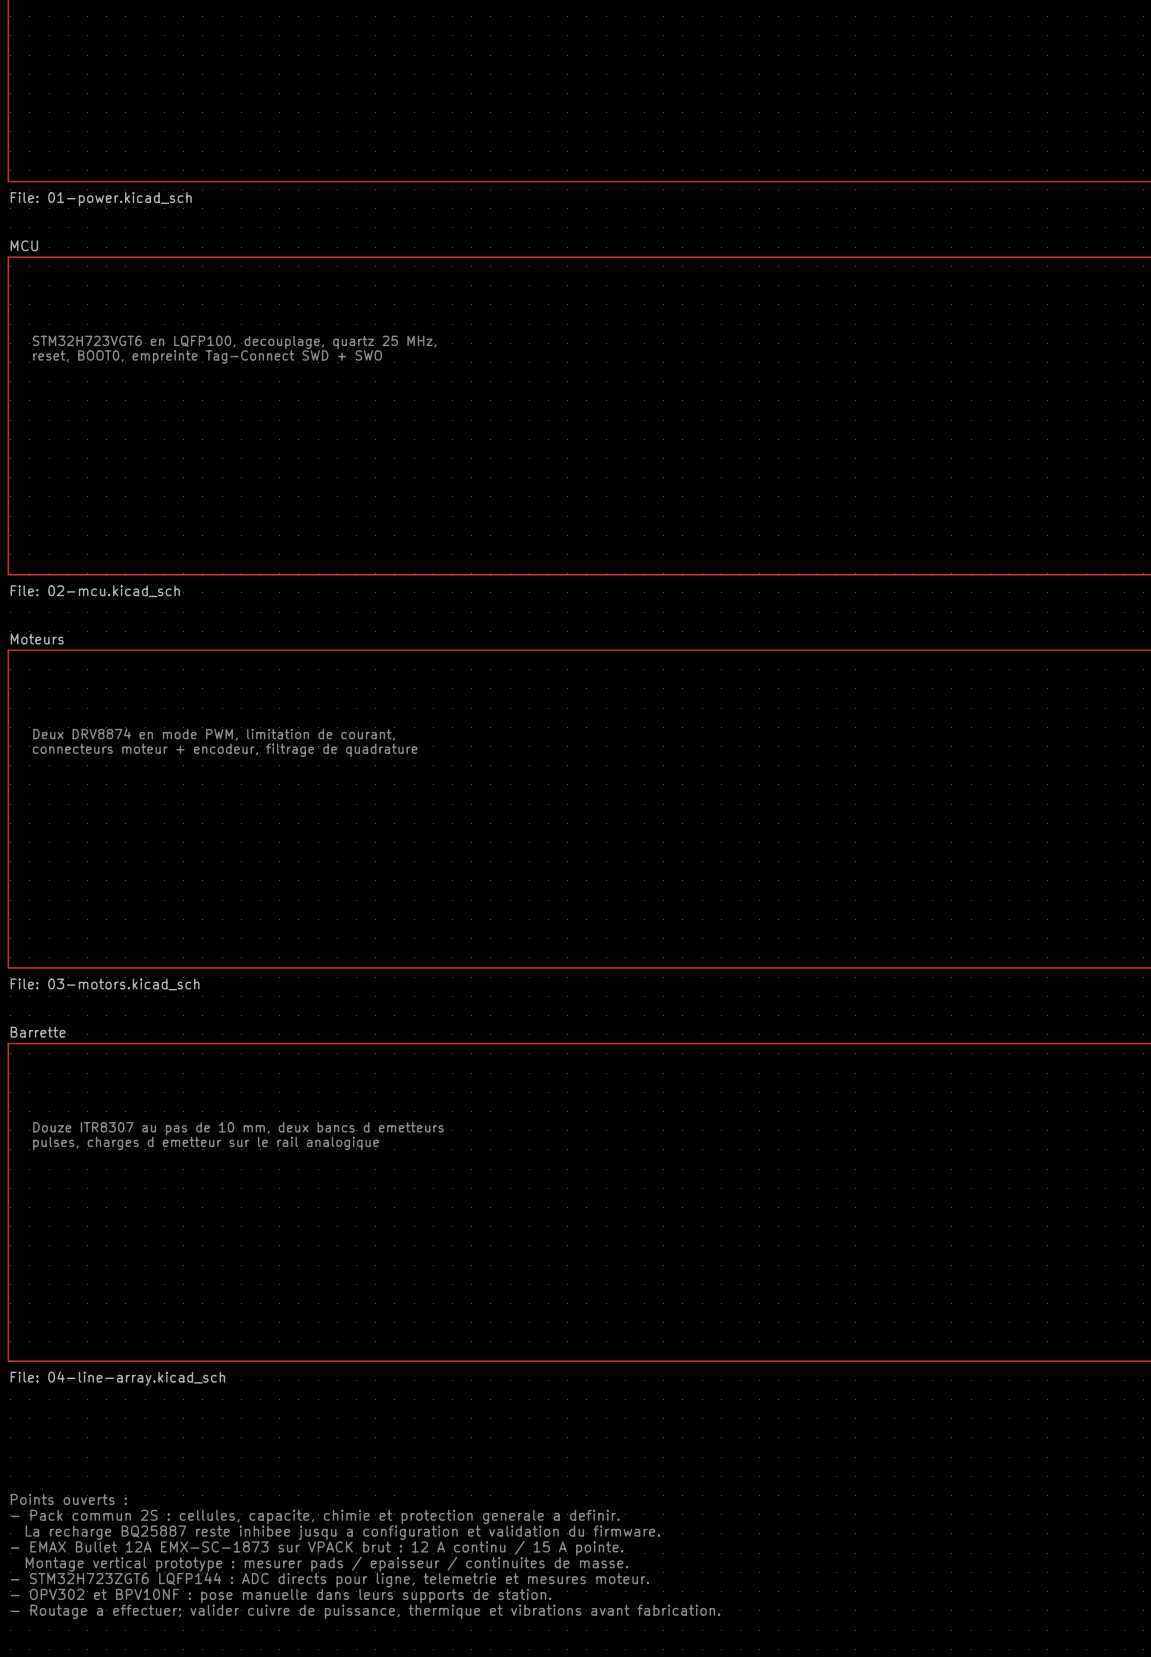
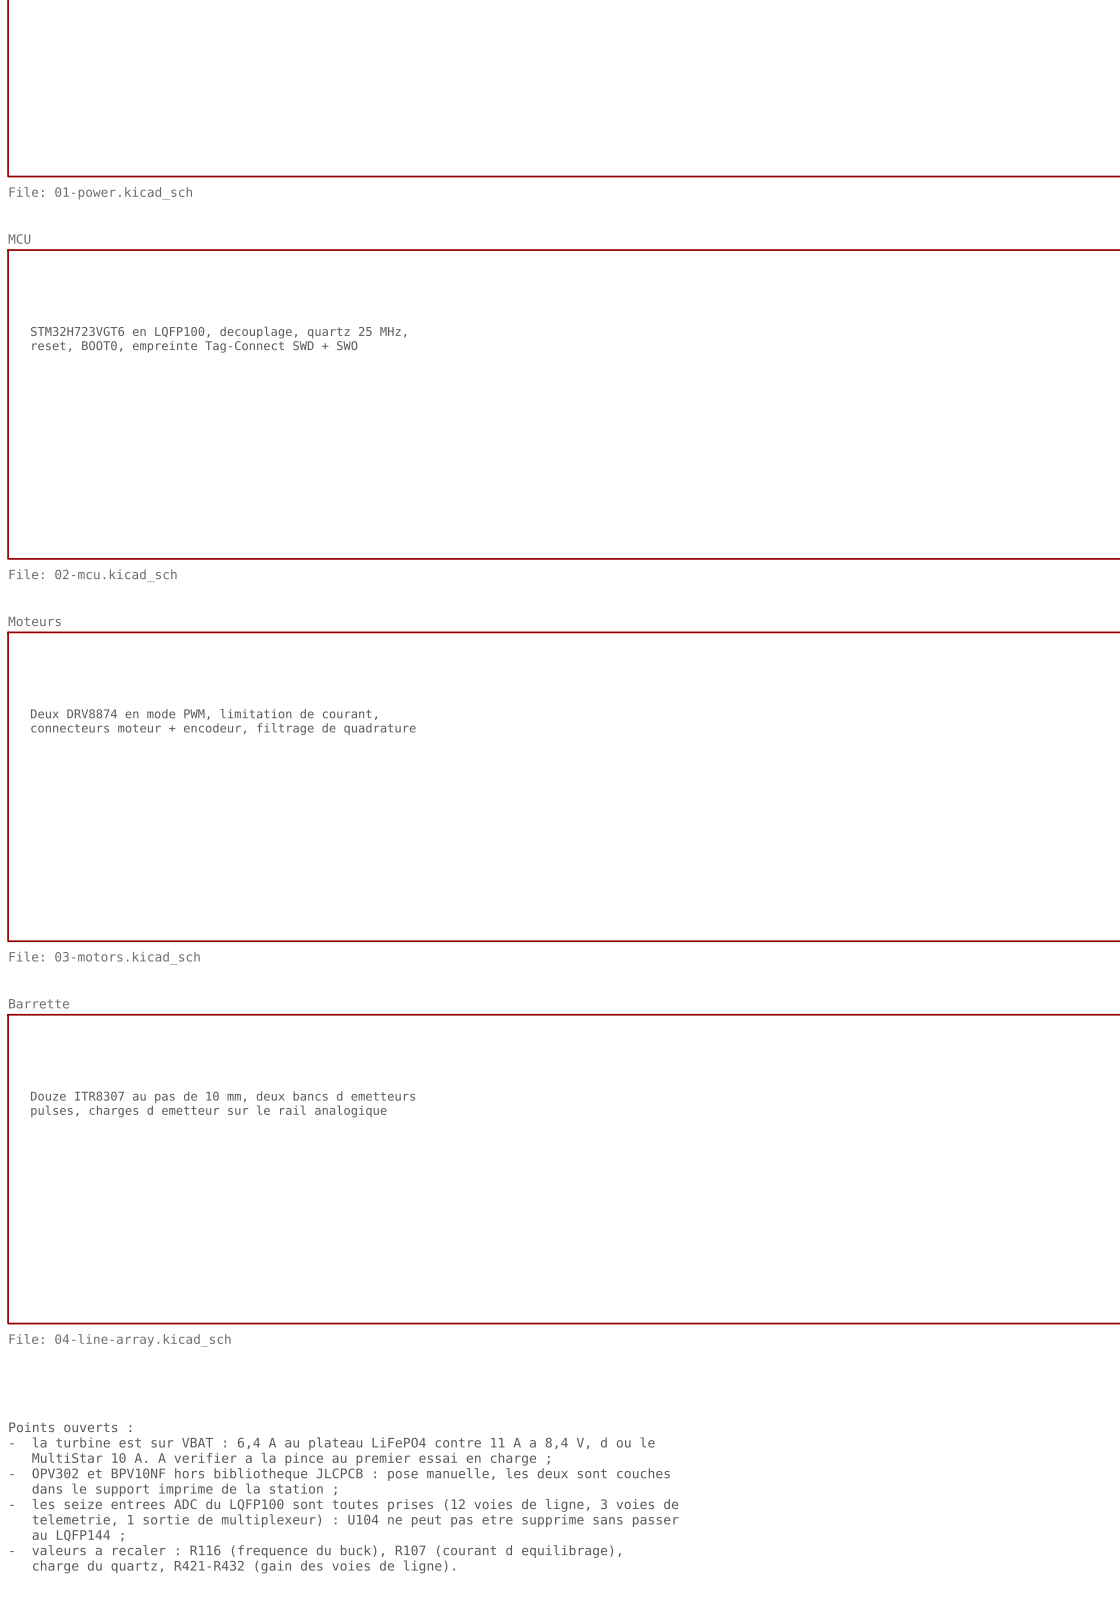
text: none -> Points ouverts : (70, 1427)
text: none -> - la turbine est sur VBAT : 6,4 A au plateau LiFePO4 contre 11 A a 8,4 V, d ou le (332, 1443)
text: Points ouverts : (68, 1499) -> MultiStar 10 A. A verifier a la pince au premier essai en charge ; (290, 1459)
text: - Pack commun 2S : cellules, capacite, chimie et protection generale a definir. (315, 1516) -> - OPV302 et BPV10NF hors bibliotheque JLCPCB : pose manuelle, les deux sont couches (340, 1474)
text: La recharge BQ25887 reste inhibee jusqu a configuration et validation du firmware. (342, 1532) -> dans le support imprime de la station ; (184, 1489)
text: - EMAX Bullet 12A EMX-SC-1873 sur VPACK brut : 12 A continu / 15 A pointe. (317, 1548) -> - les seize entrees ADC du LQFP100 sont toutes prises (12 voies de ligne, 3 voies de (344, 1505)
text: Montage vertical prototype : mesurer pads / epaisseur / continuites de masse. (326, 1564) -> telemetrie, 1 sortie de multiplexeur) : U104 ne peut pas etre supprime sans passer (355, 1520)
text: - STM32H723ZGT6 LQFP144 : ADC directs pour ligne, telemetrie et mesures moteur. (329, 1579) -> au LQFP144 ; (78, 1535)
text: - OPV302 et BPV10NF : pose manuelle dans leurs supports de station. (281, 1596) -> - valeurs a recaler : R116 (frequence du buck), R107 (courant d equilibrage), (315, 1551)
text: - Routage a effectuer; valider cuivre de puissance, thermique et vibrations avant fabrication. (365, 1611) -> charge du quartz, R421-R432 (gain des voies de ligne). (243, 1566)

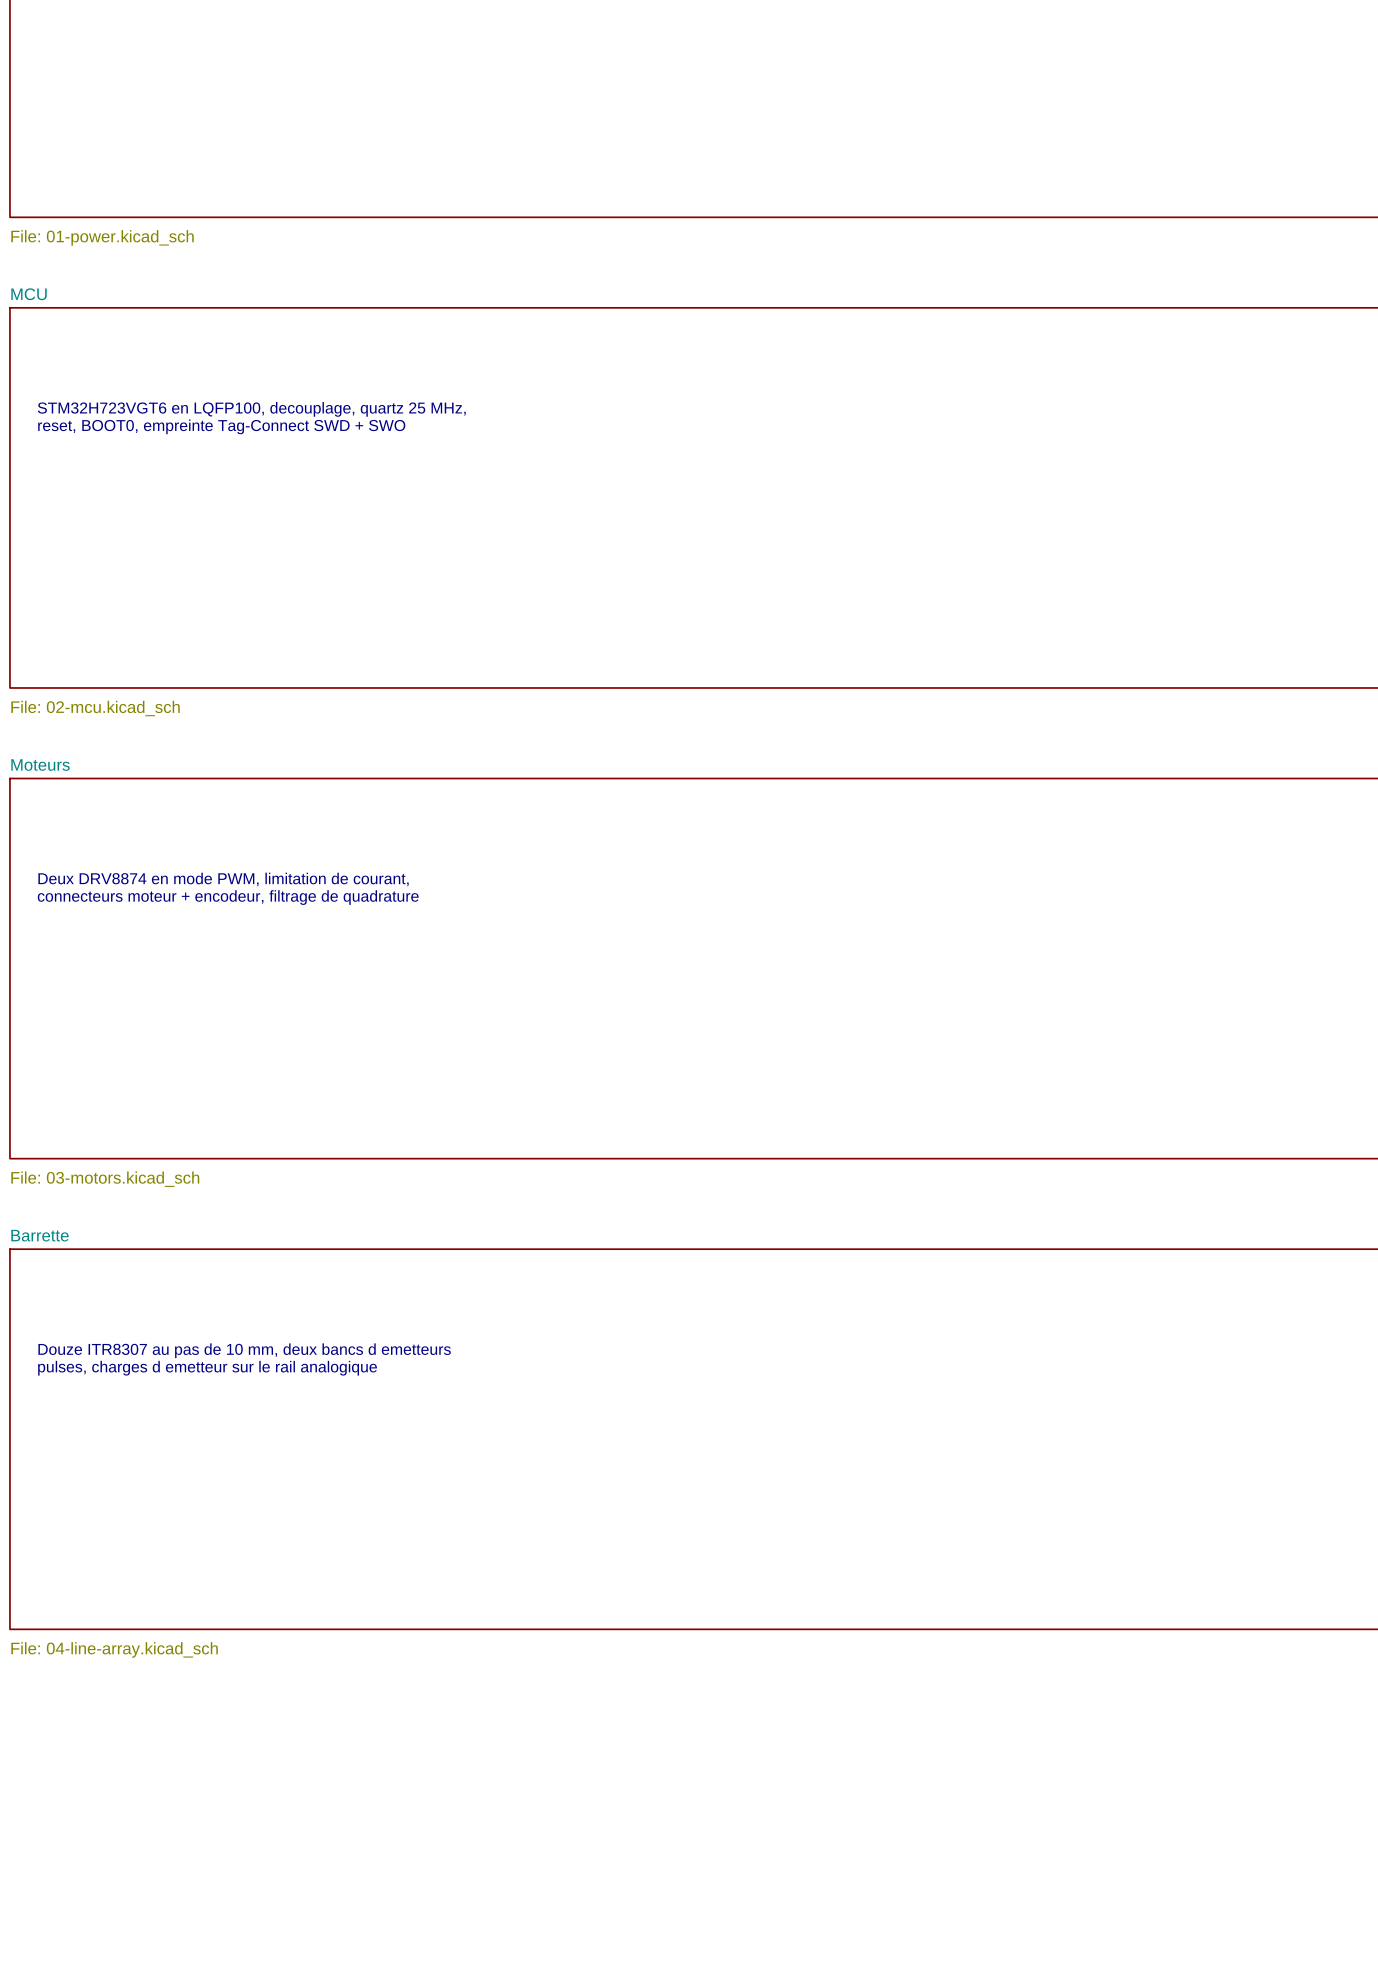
text: Points ouverts : (70, 1427) -> none
text: - la turbine est sur VBAT : 6,4 A au plateau LiFePO4 contre 11 A a 8,4 V, d ou le (332, 1443) -> none
text: MultiStar 10 A. A verifier a la pince au premier essai en charge ; (290, 1459) -> none
text: - OPV302 et BPV10NF hors bibliotheque JLCPCB : pose manuelle, les deux sont couches (340, 1474) -> none
text: dans le support imprime de la station ; (184, 1489) -> none
text: - les seize entrees ADC du LQFP100 sont toutes prises (12 voies de ligne, 3 voies de (344, 1505) -> none
text: telemetrie, 1 sortie de multiplexeur) : U104 ne peut pas etre supprime sans passer (355, 1520) -> none
text: au LQFP144 ; (78, 1535) -> none
text: - valeurs a recaler : R116 (frequence du buck), R107 (courant d equilibrage), (315, 1551) -> none
text: charge du quartz, R421-R432 (gain des voies de ligne). (243, 1566) -> none

